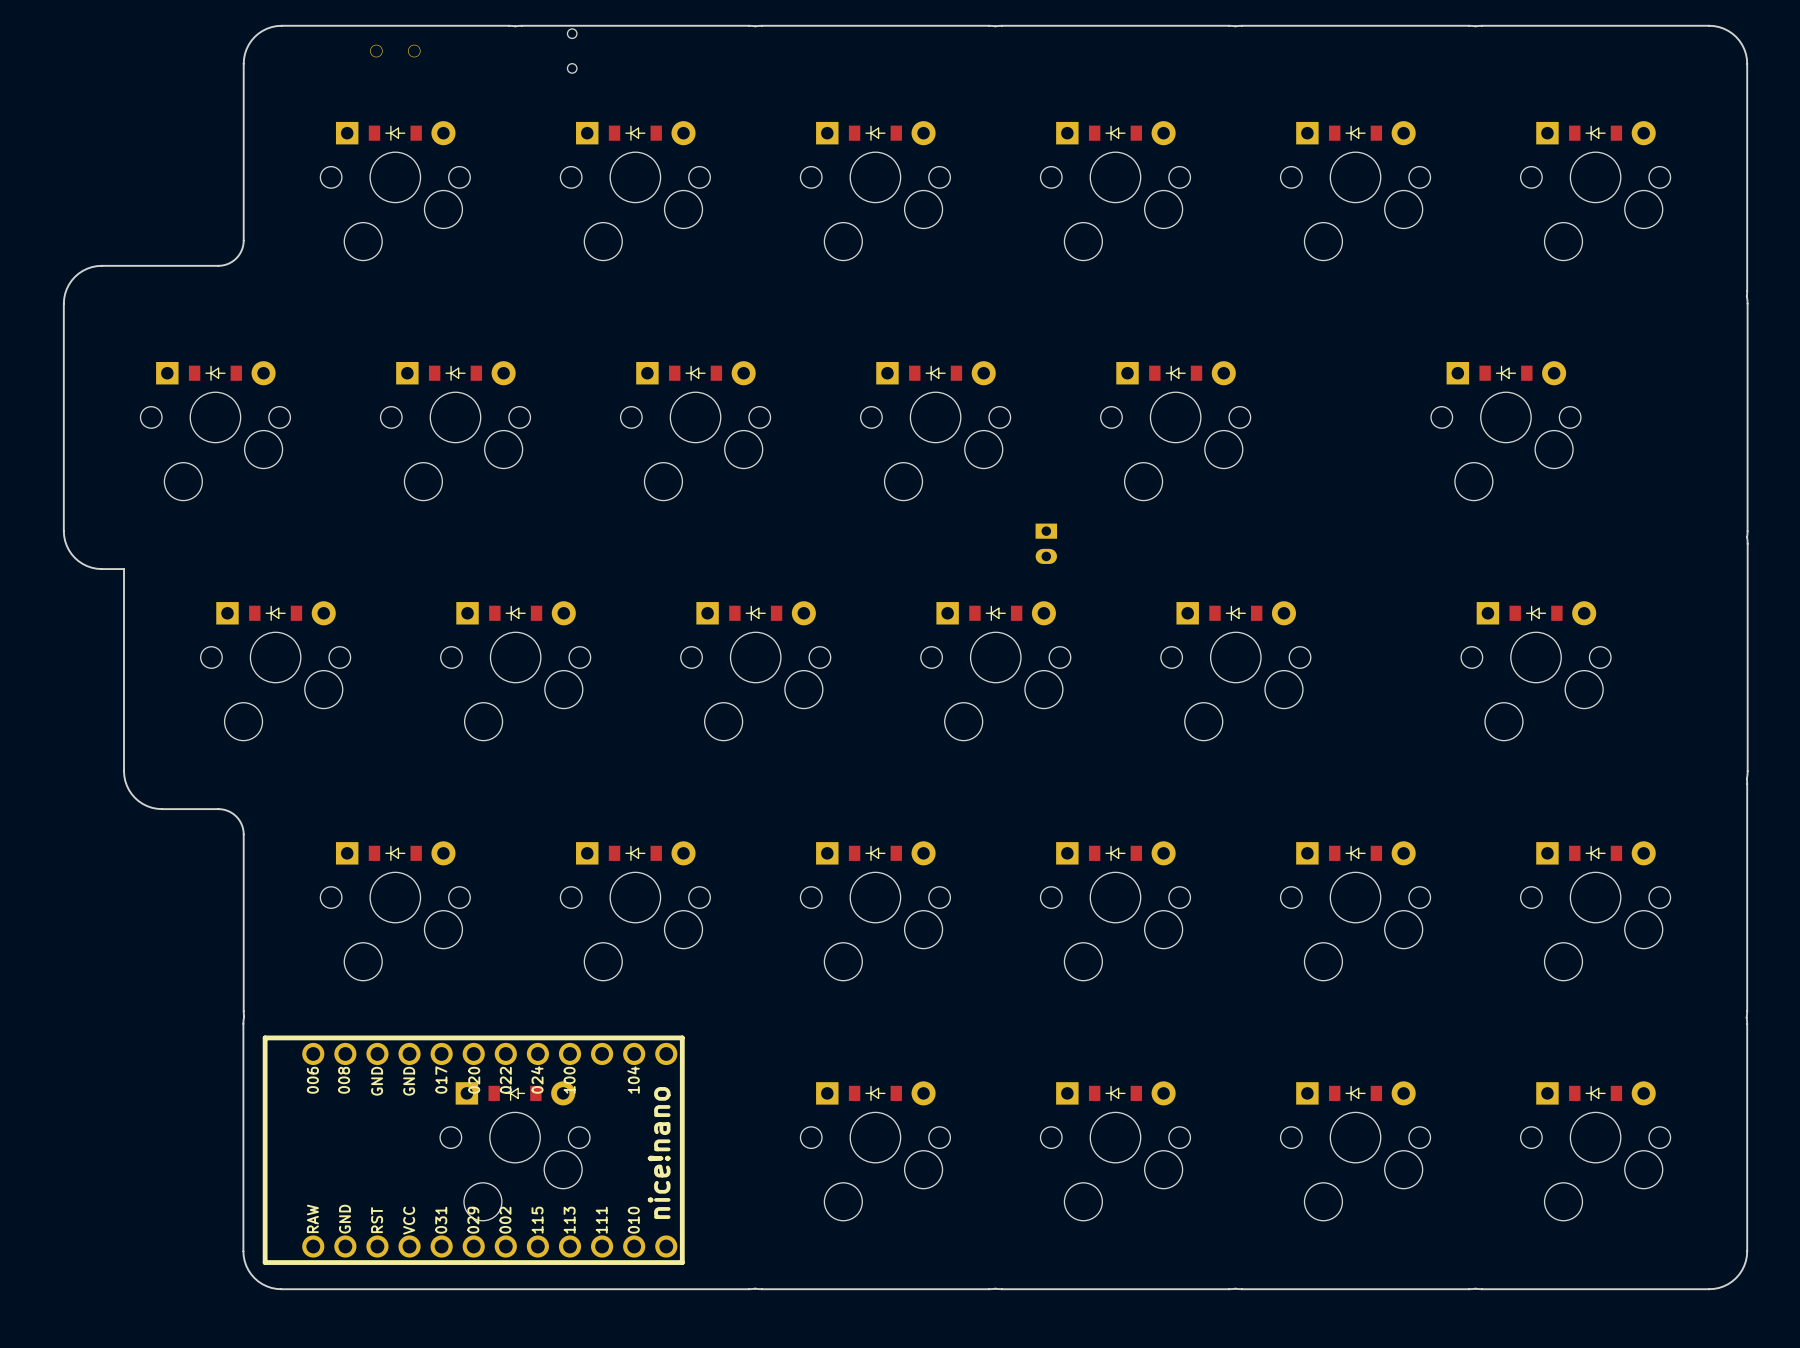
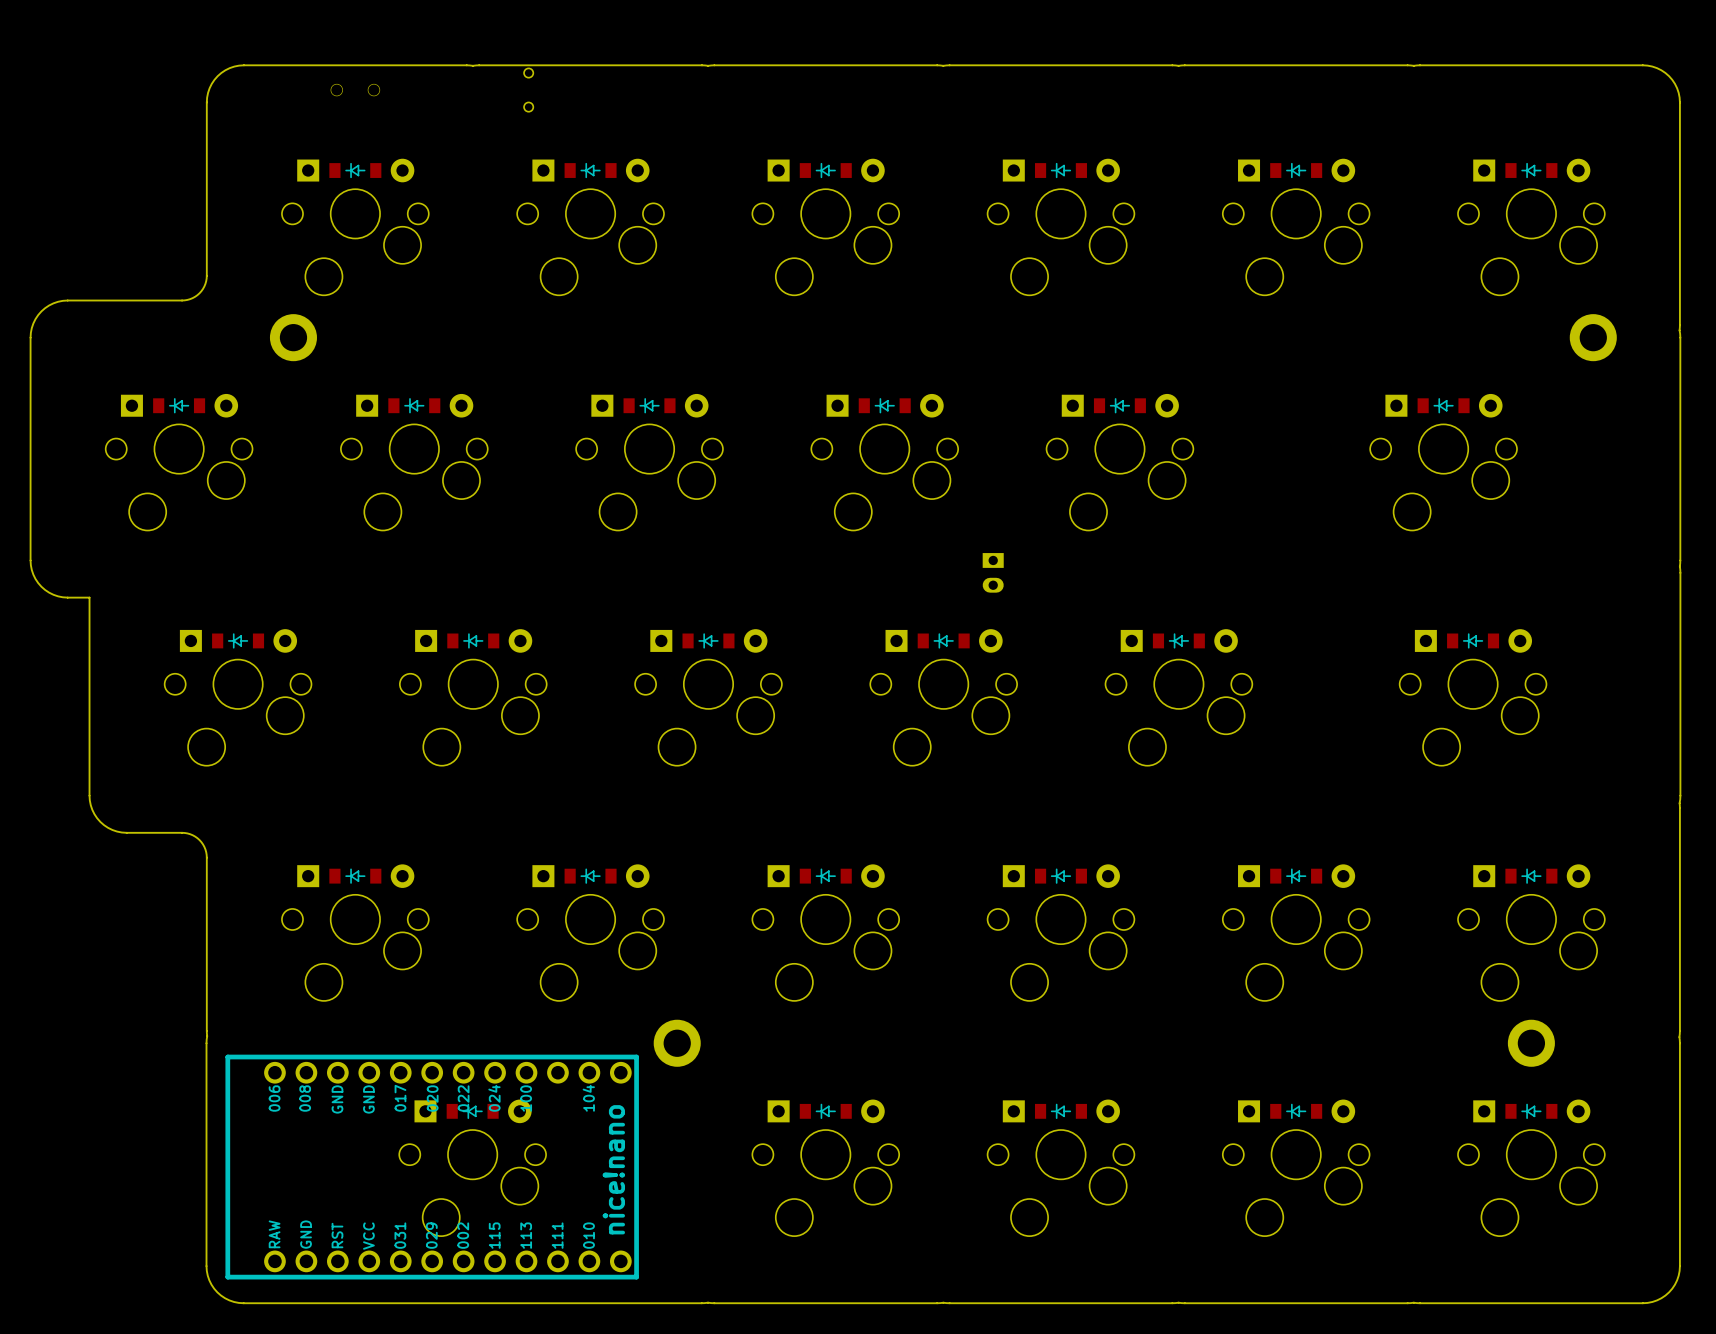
part: none -> (293, 337)
part: none -> (1593, 337)
part: none -> (677, 1043)
part: none -> (1531, 1043)

